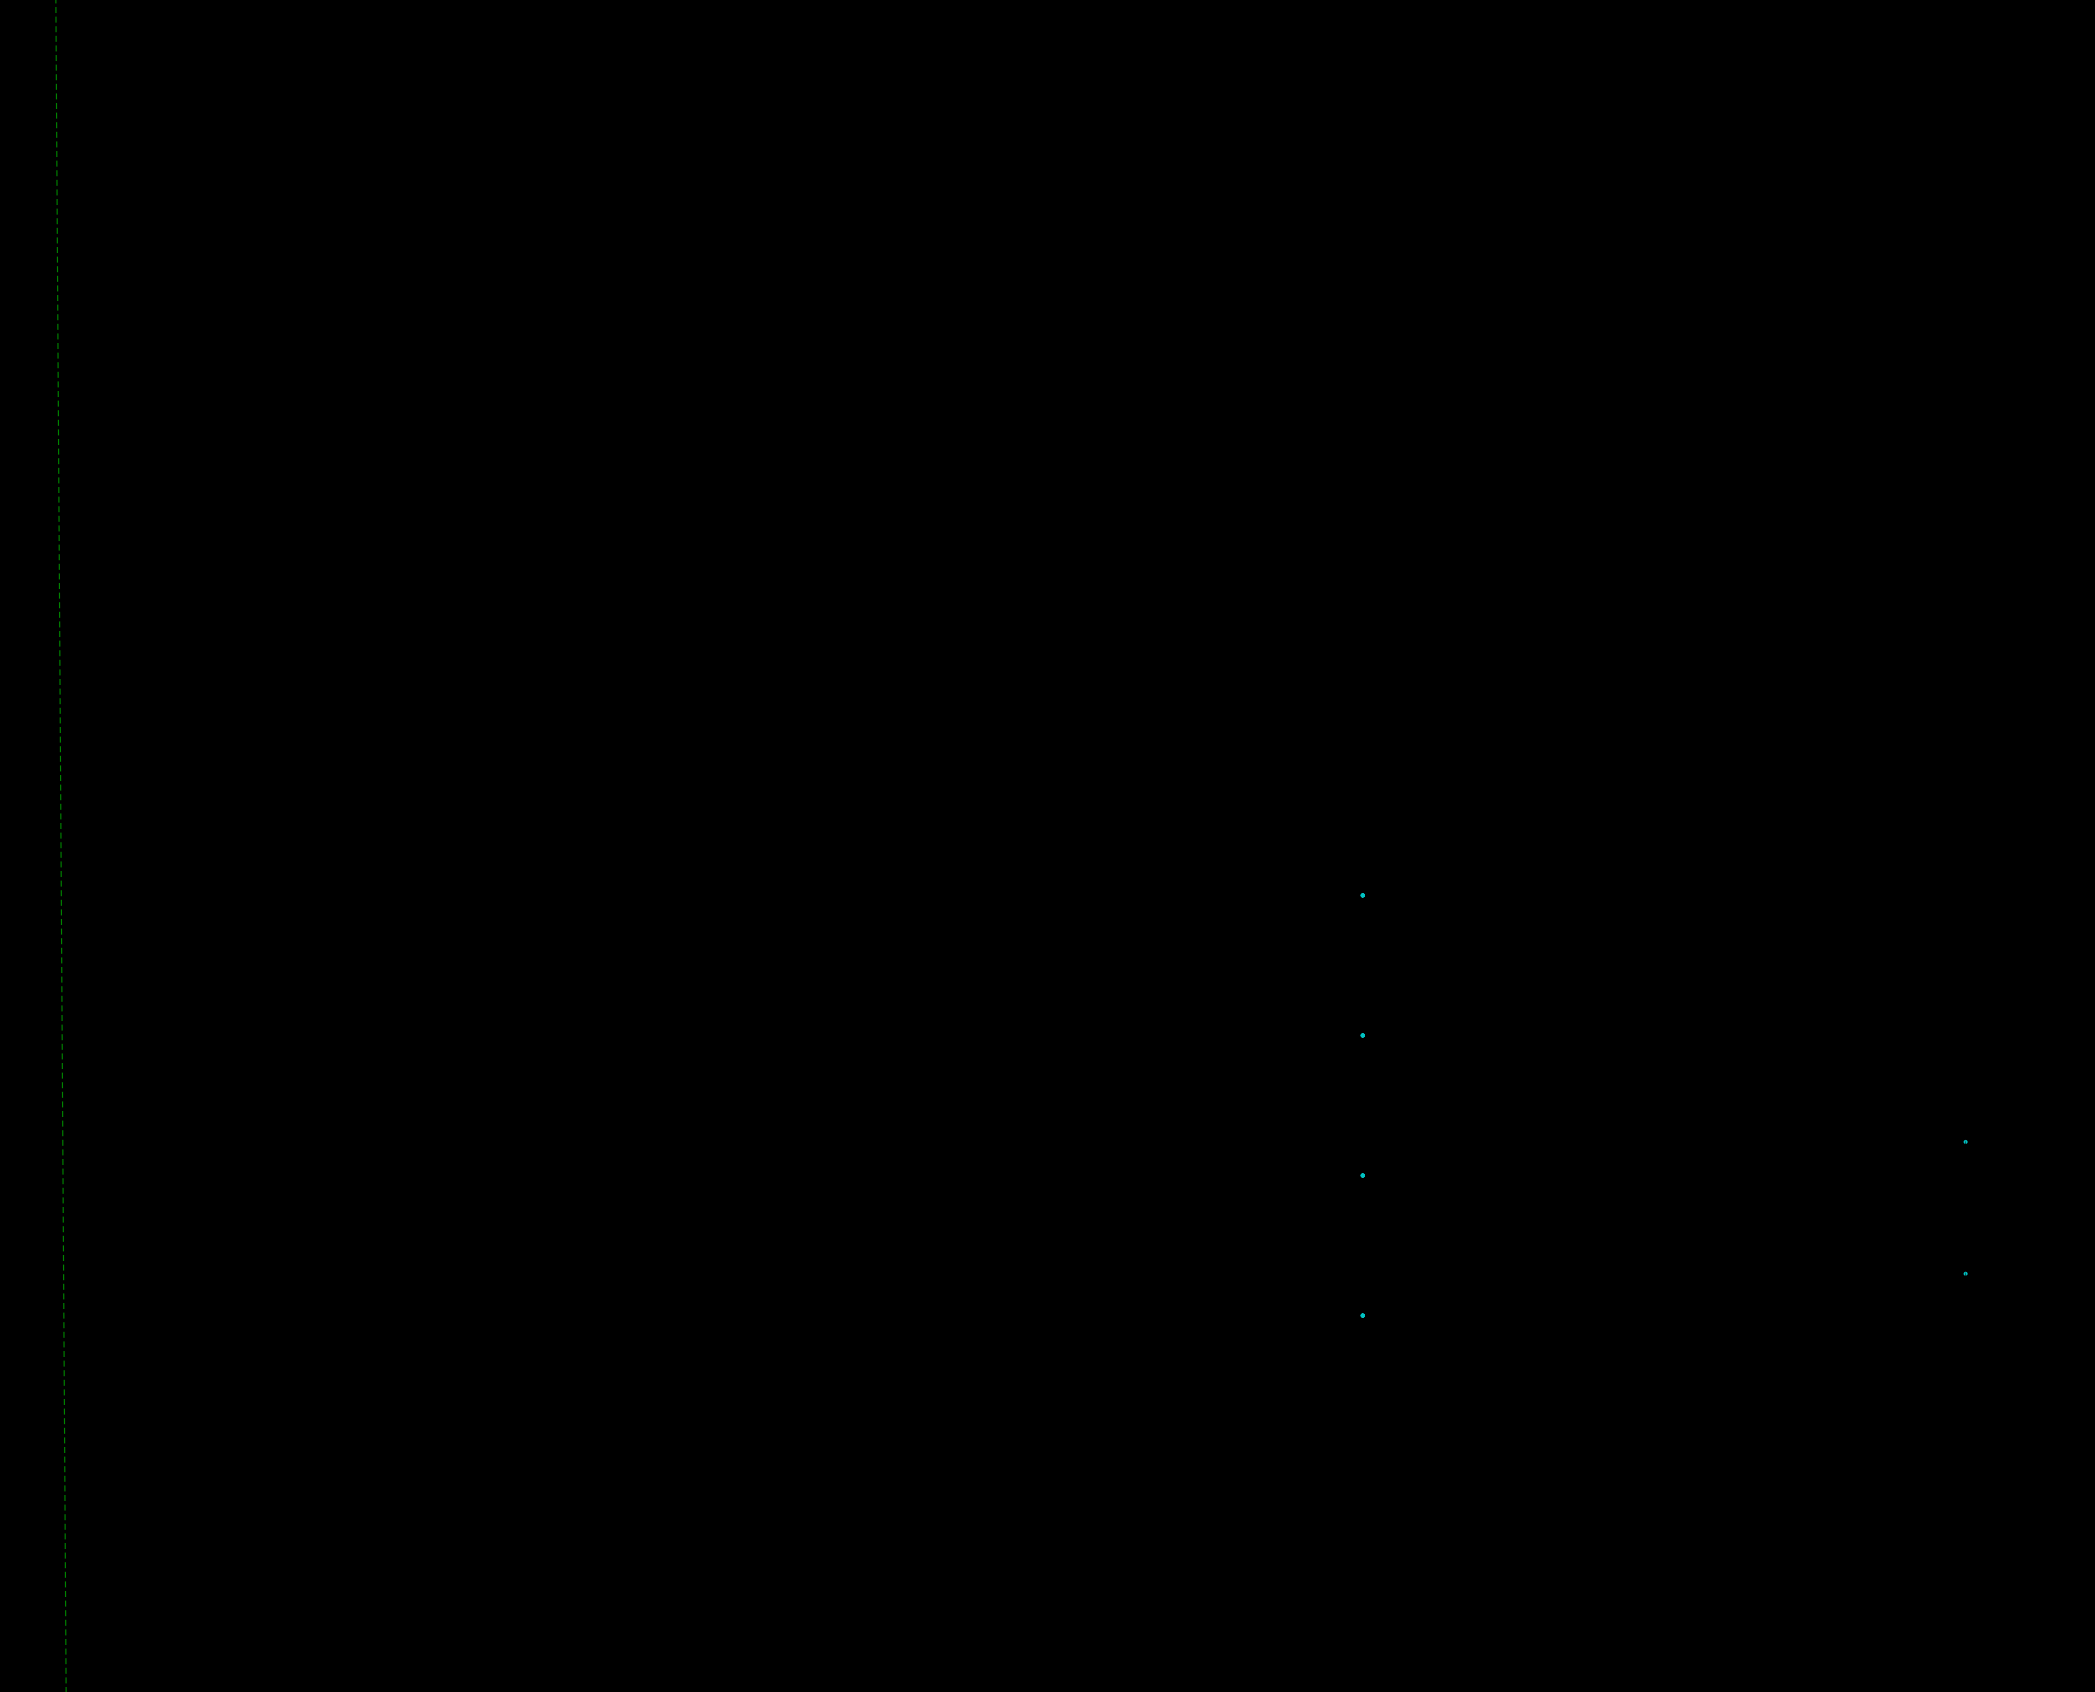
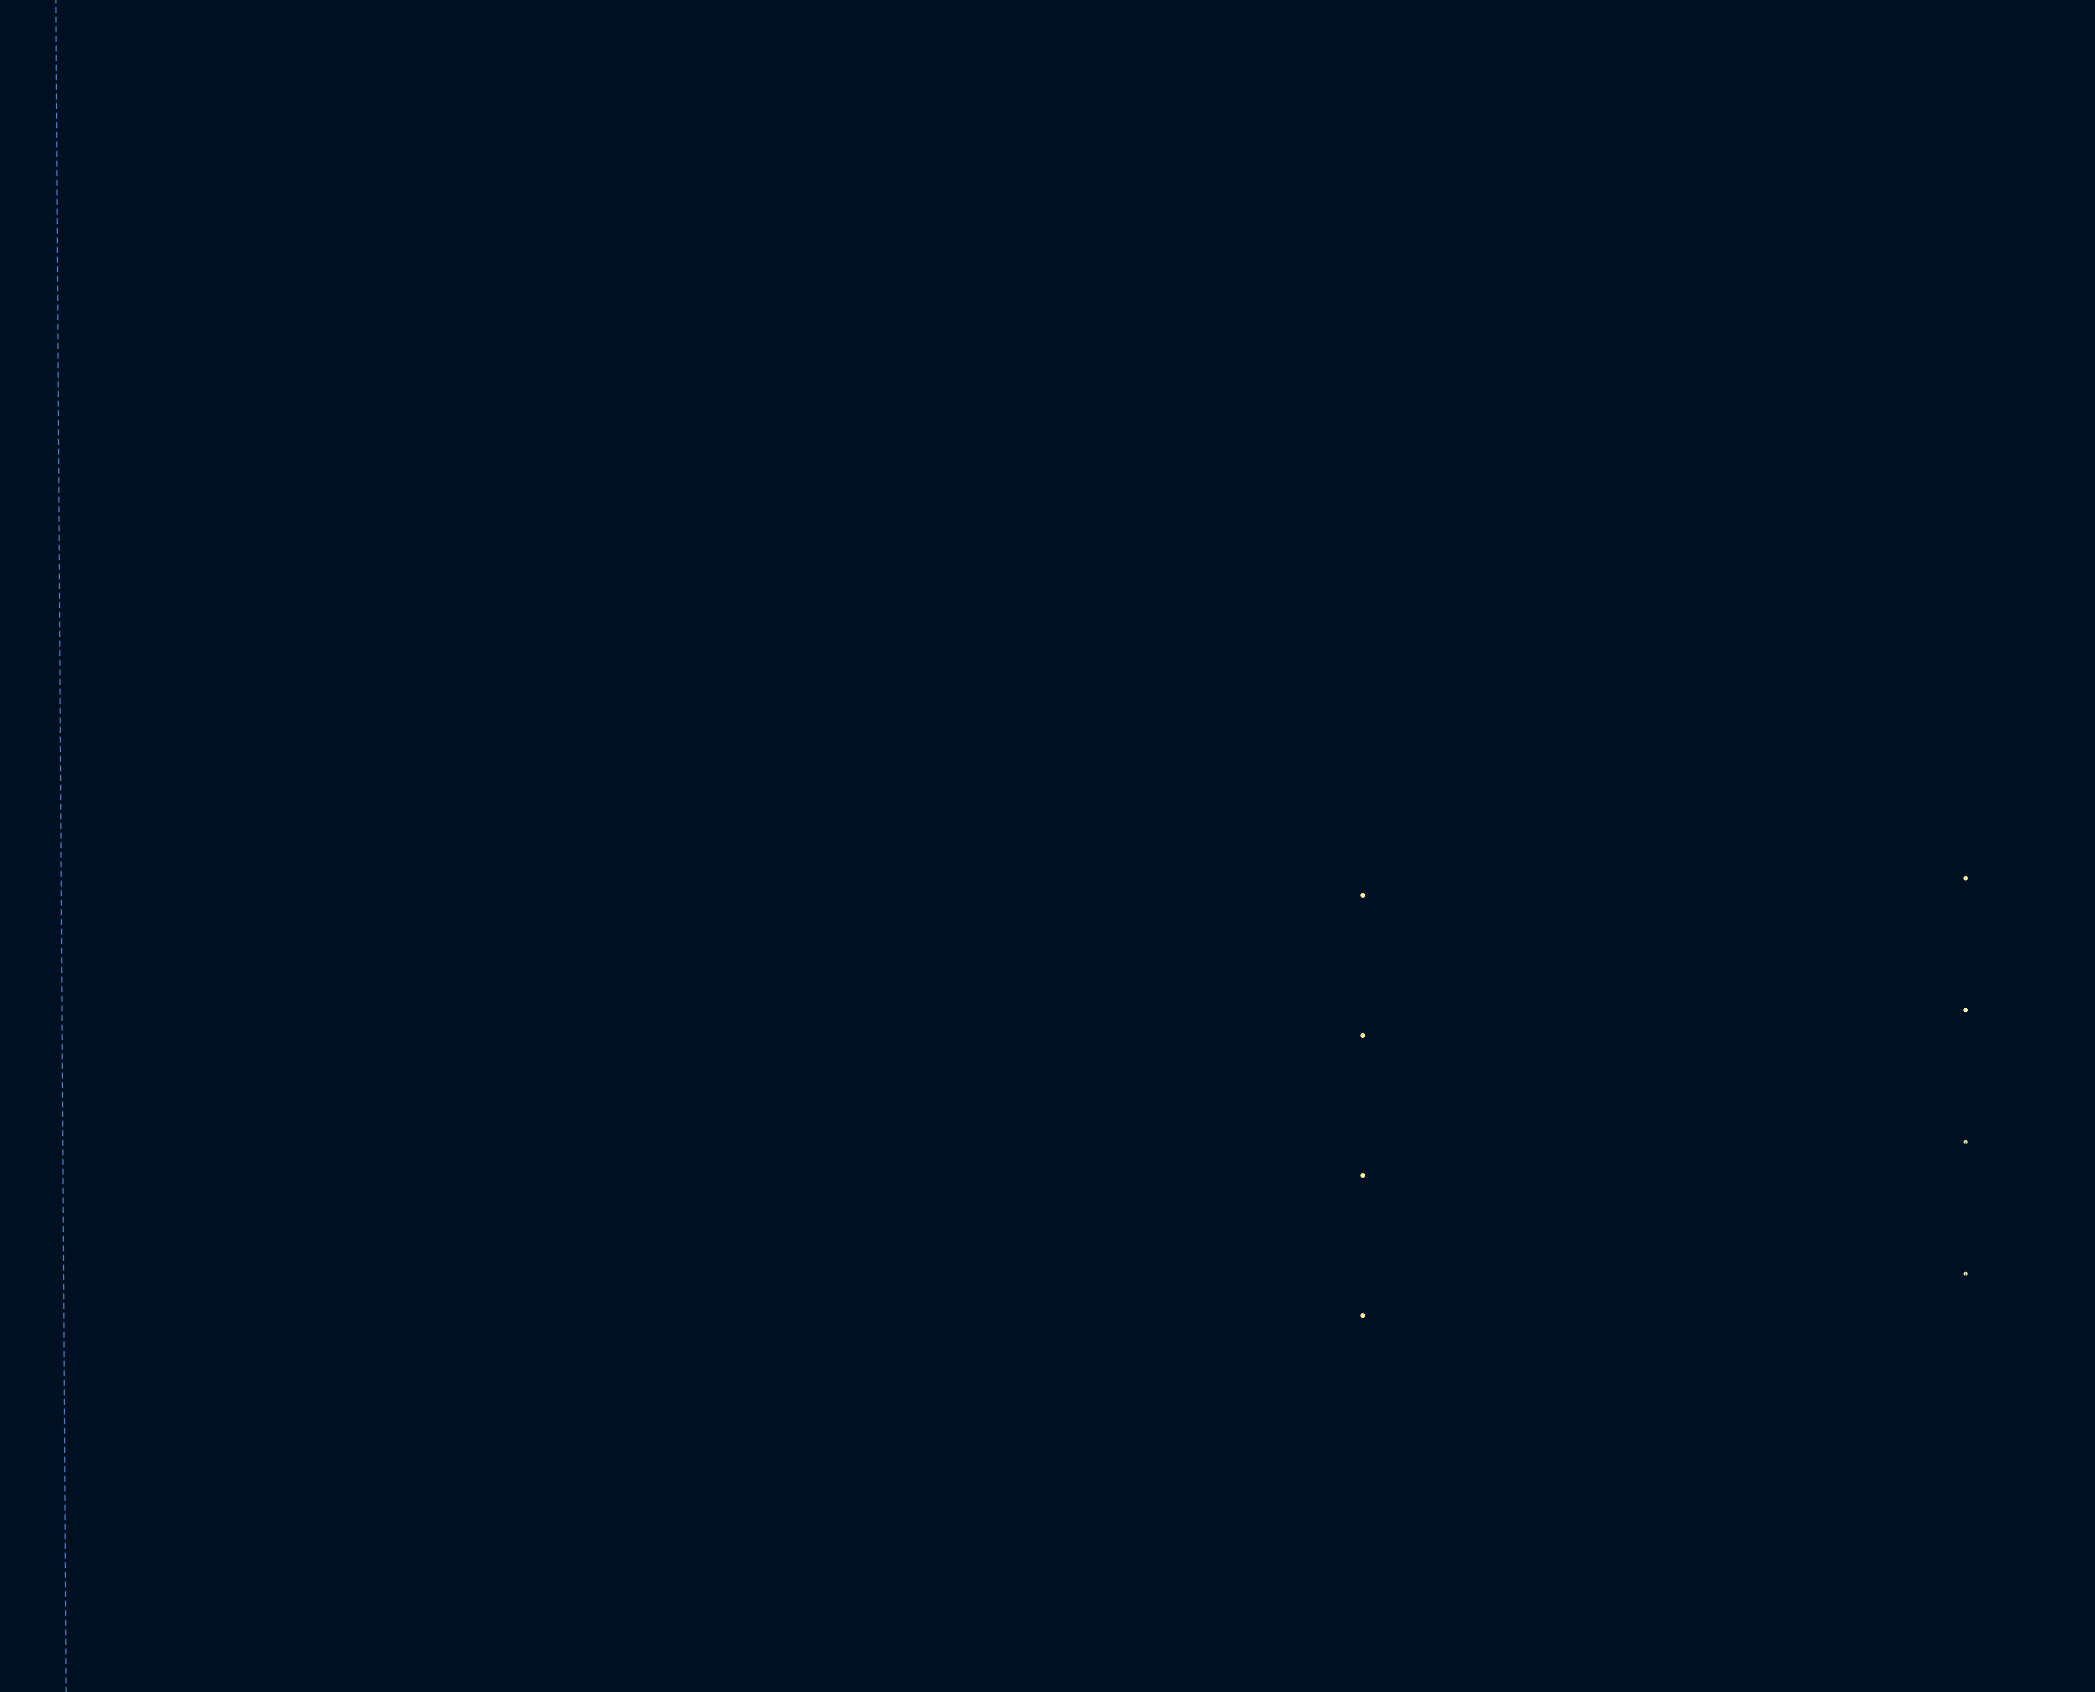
drawing: none -> [1963, 876, 1968, 881]
drawing: none -> [1963, 1008, 1968, 1013]

